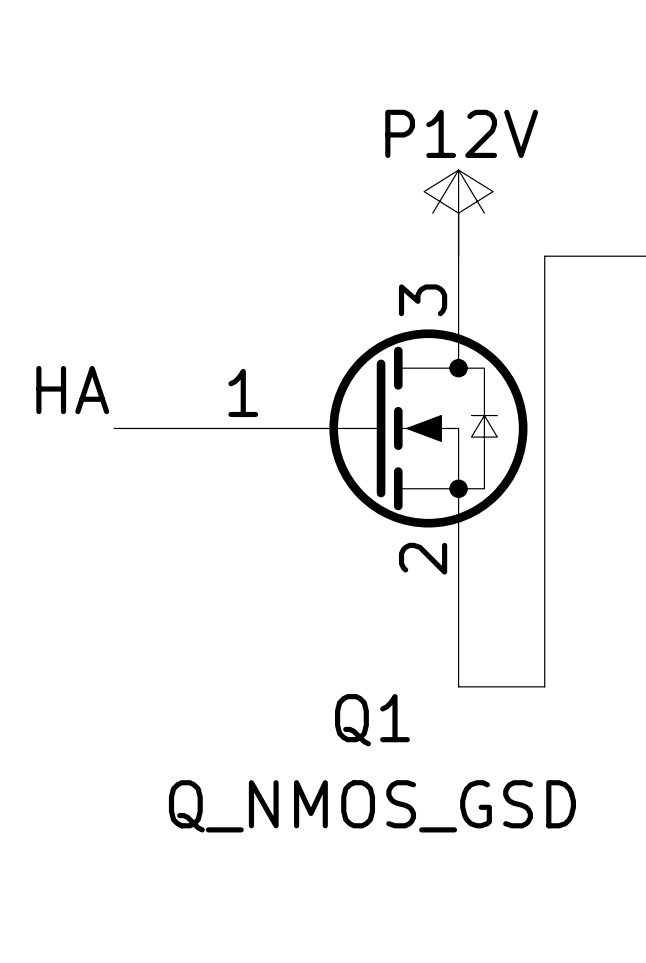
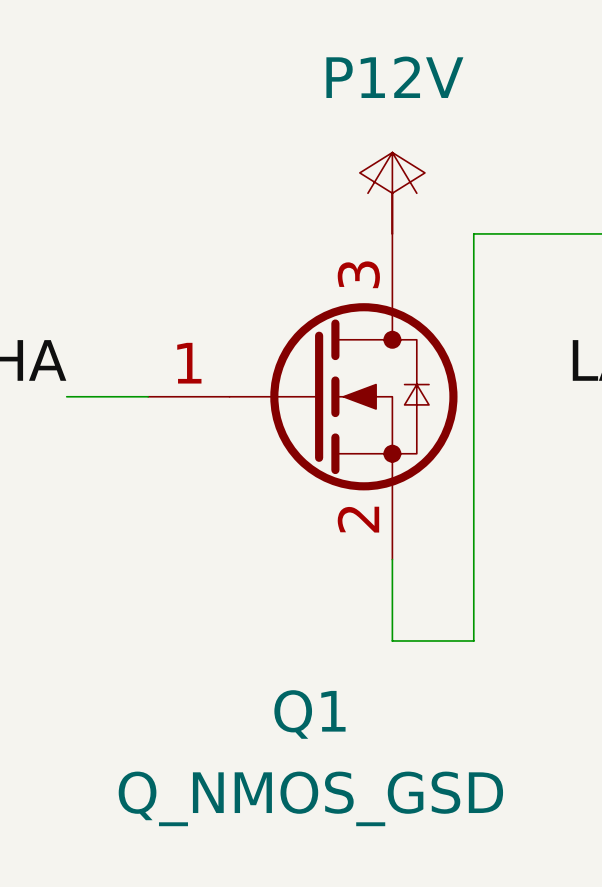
power symbol text position: P12V (461, 133) -> P12V (394, 77)
Q1 name position: Q1 (372, 720) -> Q1 (309, 714)
Q1 value position: Q_NMOS_GSD (372, 806) -> Q_NMOS_GSD (310, 798)

